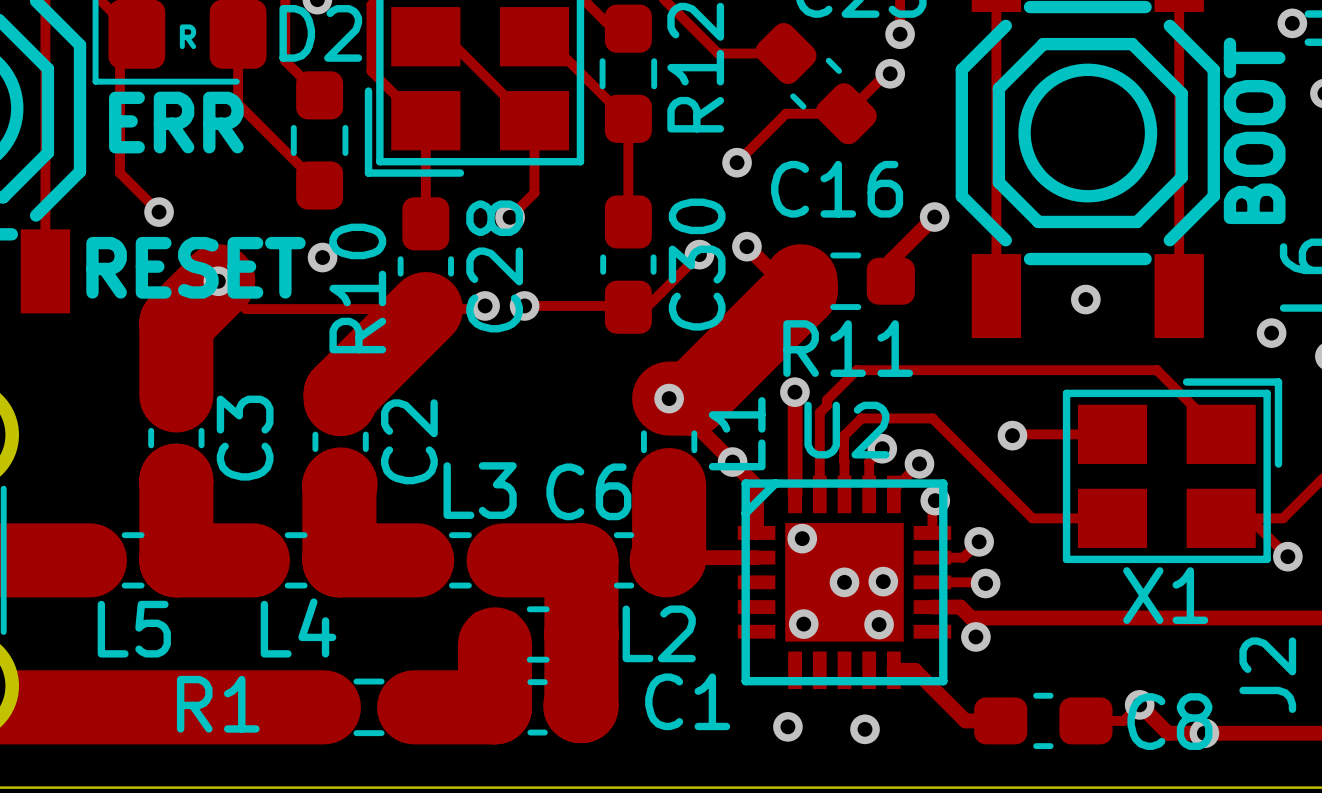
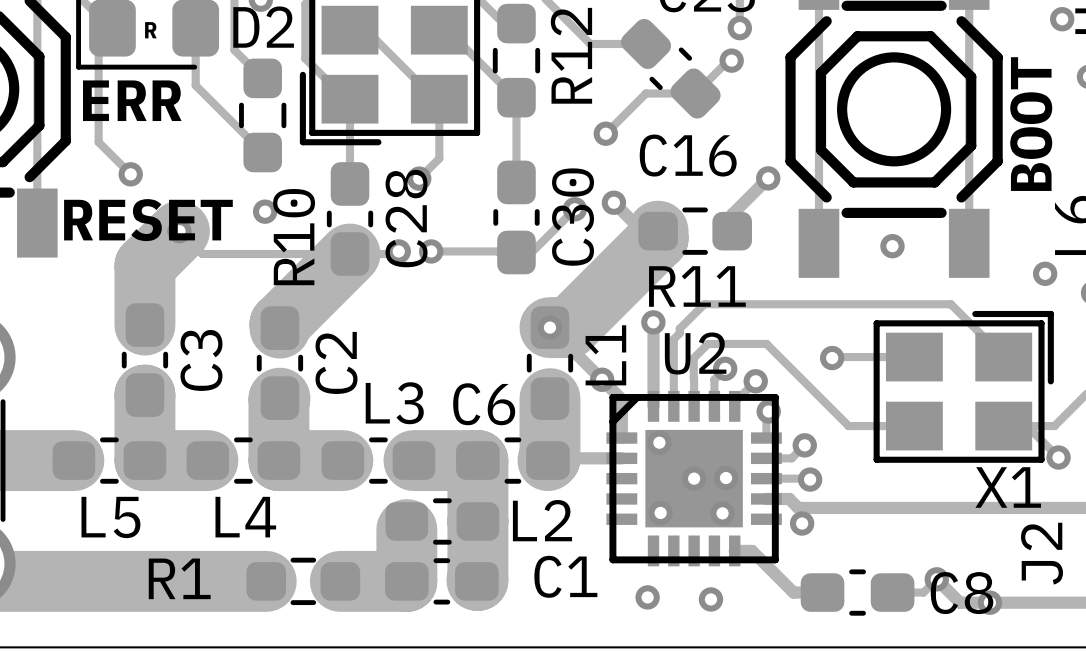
X1 name position: X1 (1165, 595) -> X1 (1008, 487)

